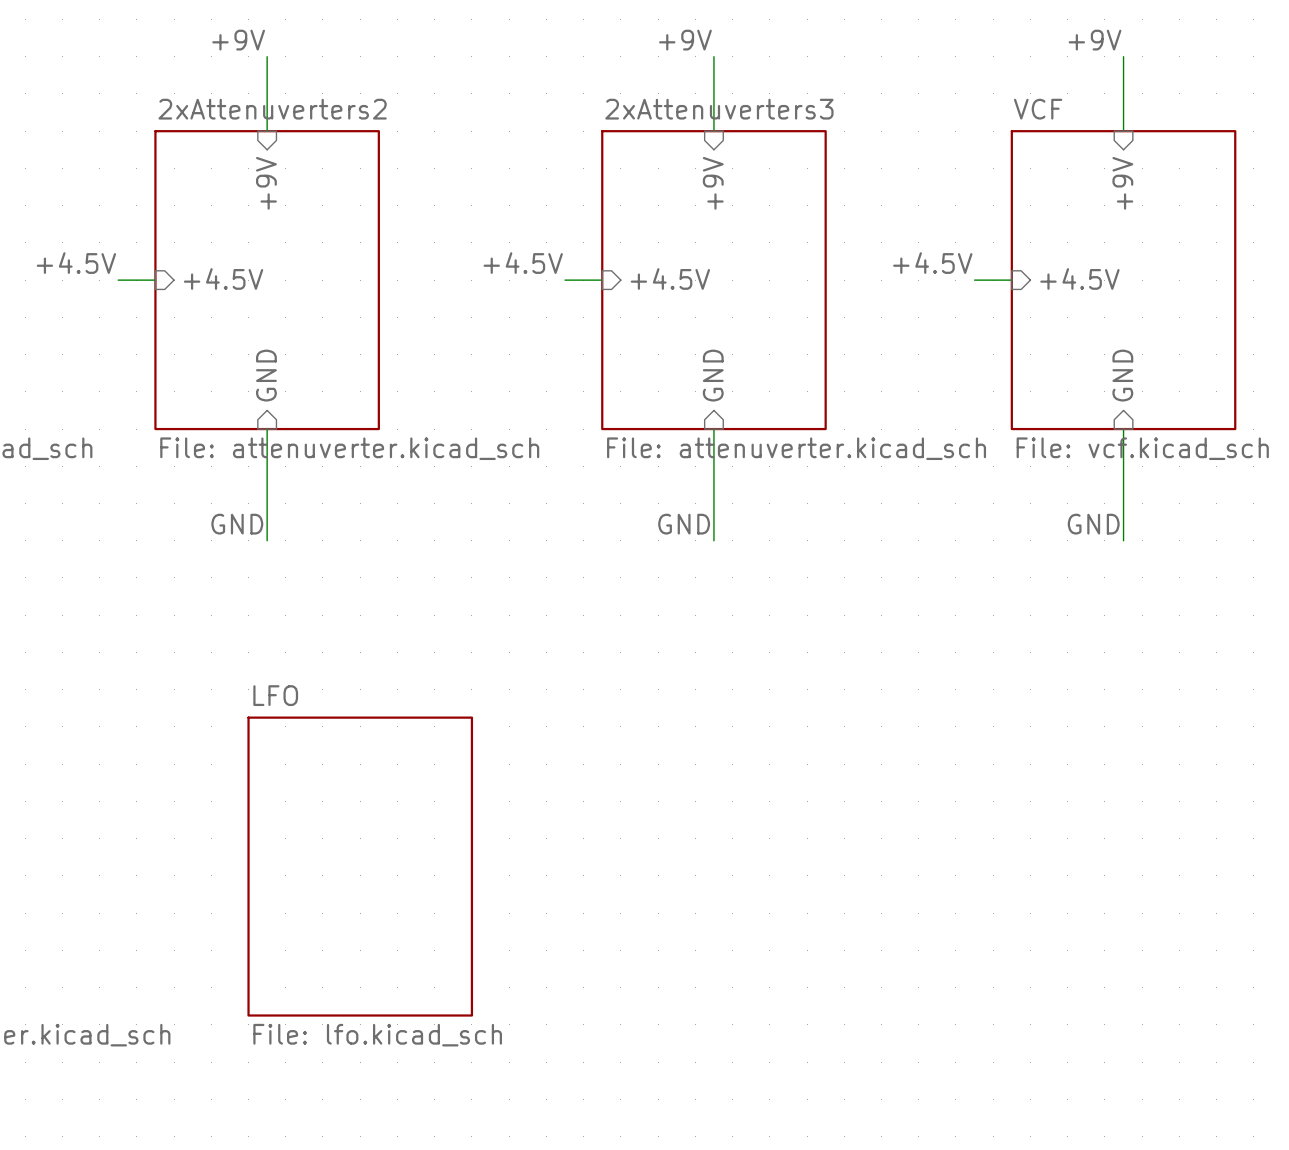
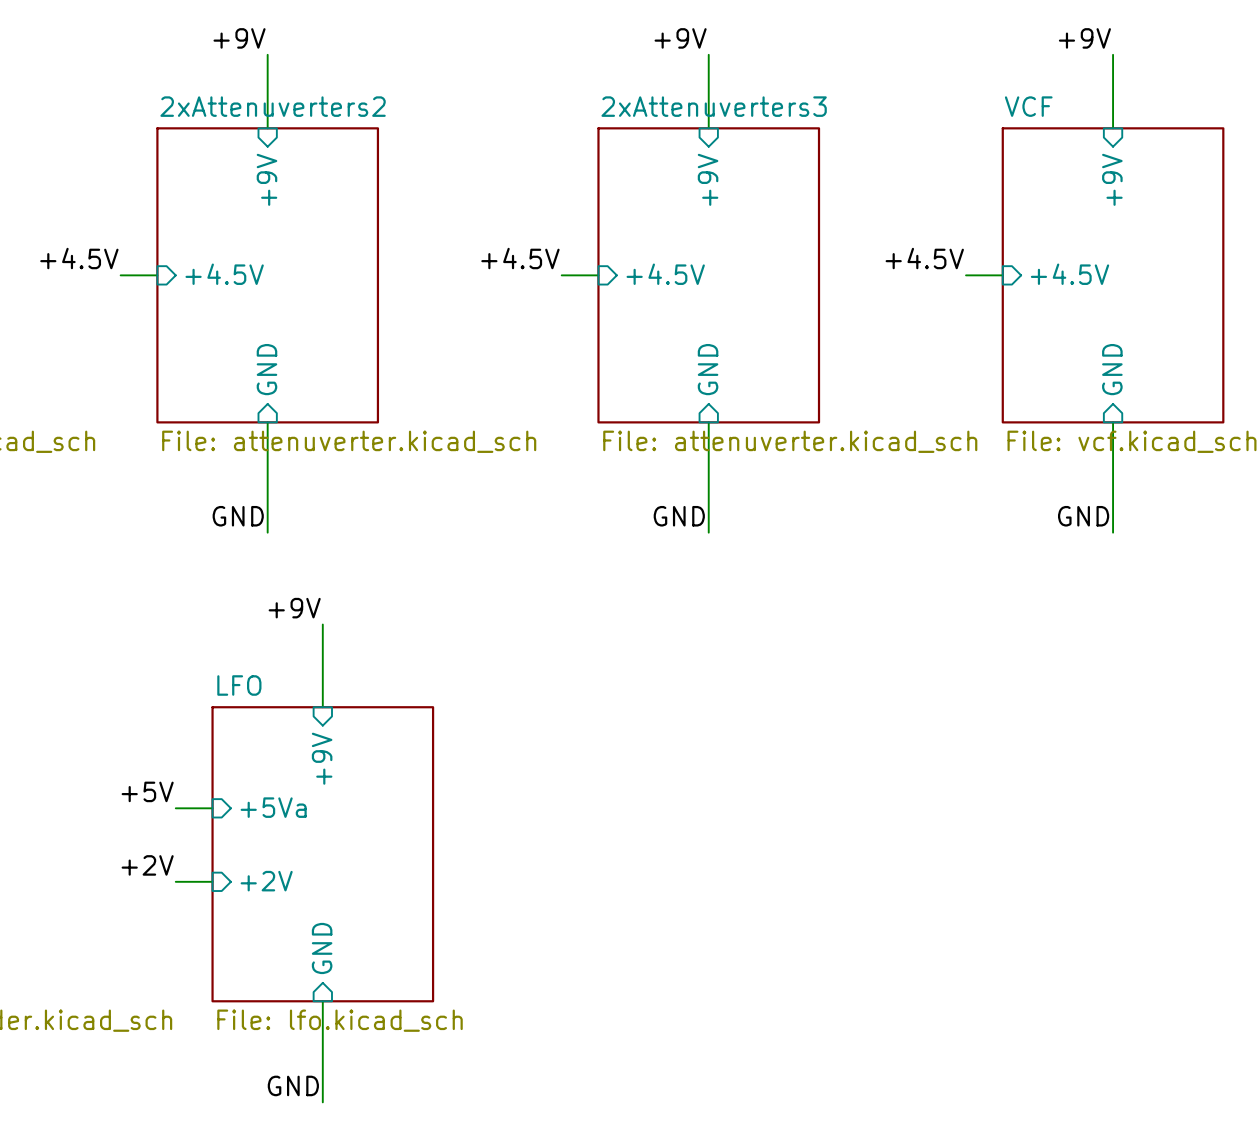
label: none -> +9V (294, 608)
wire: none -> (322, 624) (322, 707)
sheet pin: none -> +9V (322, 758)
label: none -> +5V (147, 791)
sheet pin: none -> +5Va (273, 807)
wire: none -> (175, 808) (212, 808)
sheet LFO position: (360, 866) -> (322, 854)
label: none -> +2V (147, 865)
sheet pin: none -> +2V (266, 881)
wire: none -> (175, 881) (212, 881)
sheet pin: none -> GND (322, 948)
wire: none -> (322, 1001) (322, 1102)
label: none -> GND (293, 1085)

